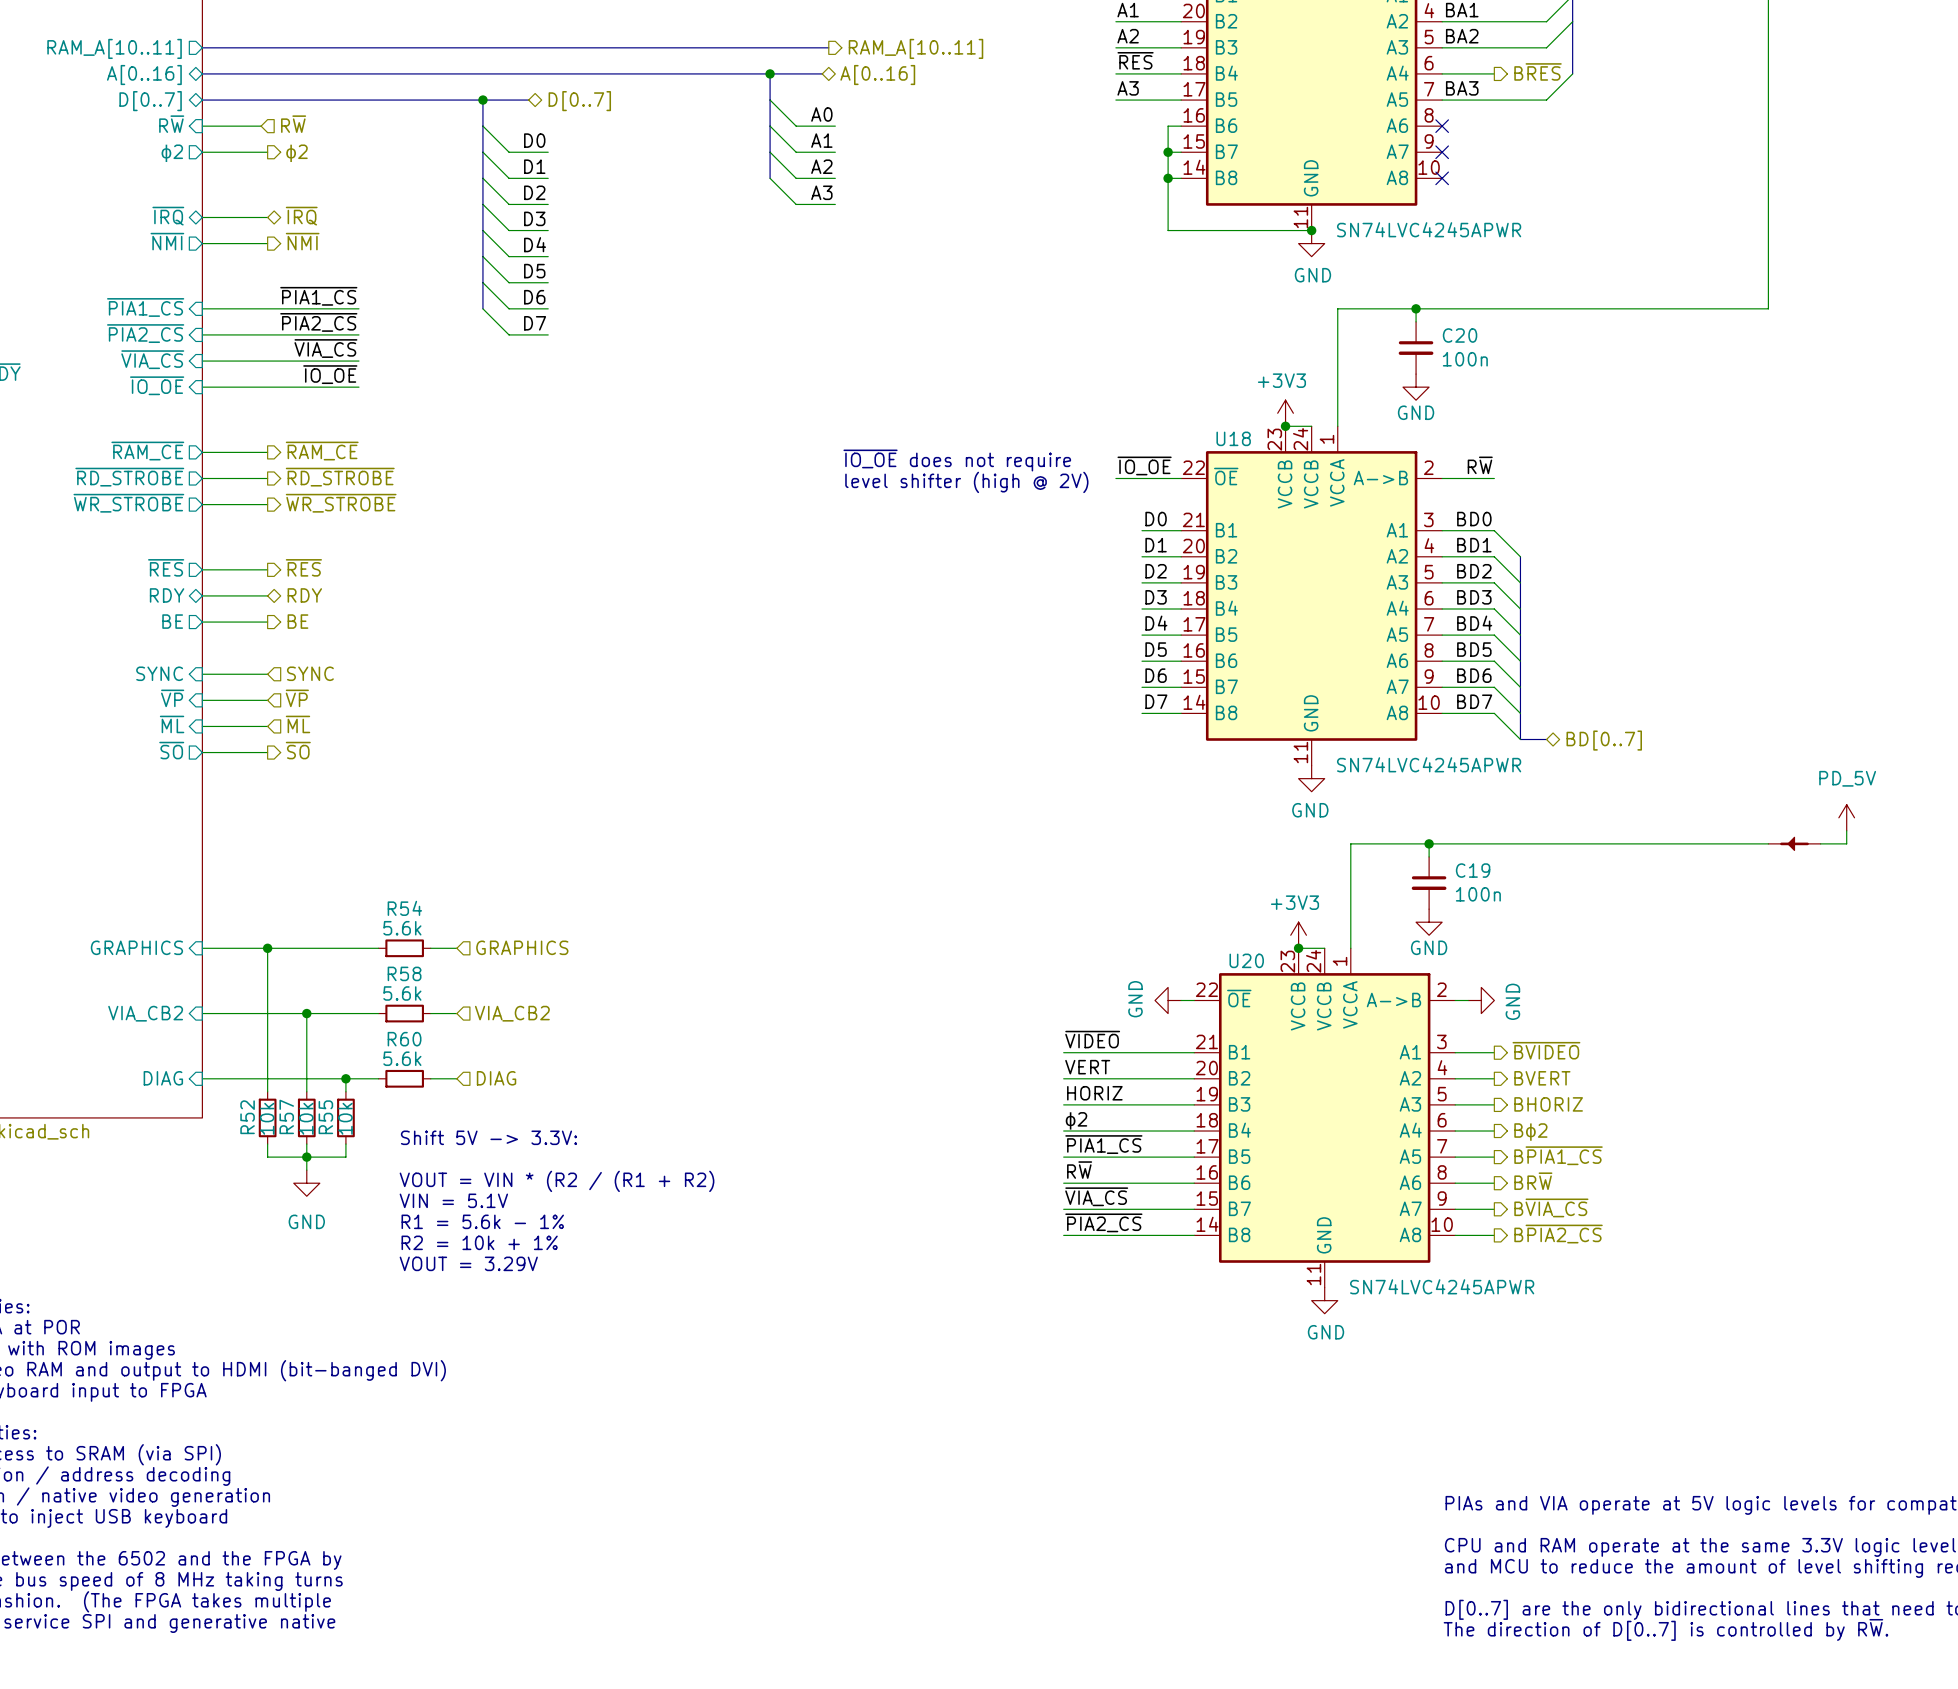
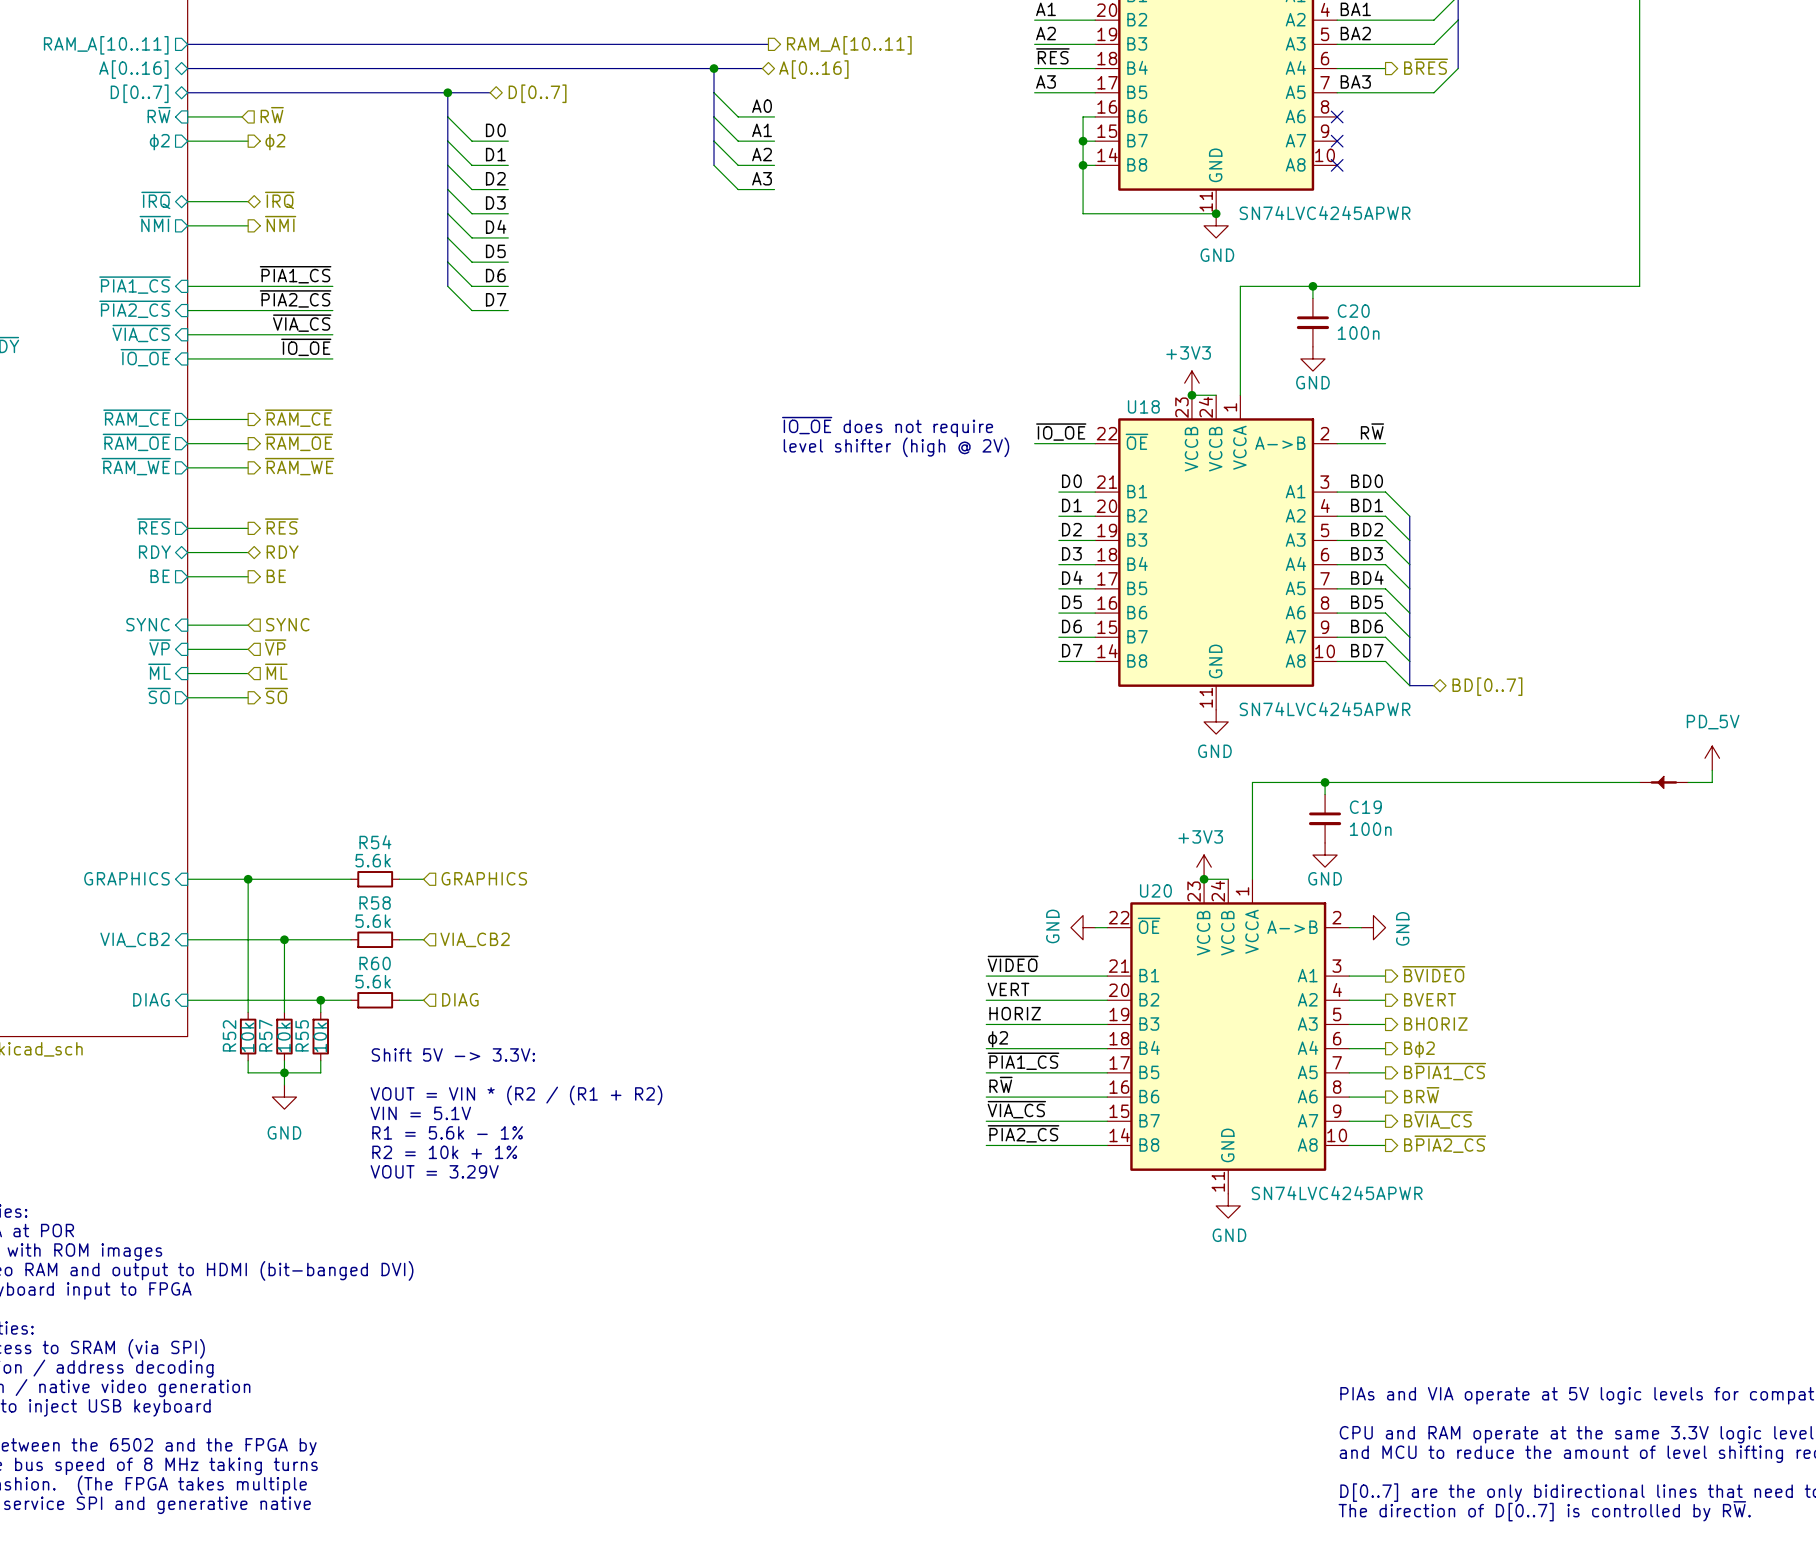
sheet pin: ~{RD_STROBE} (129, 477) -> ~{RAM_OE} (136, 442)
hierarchical label: ~{RD_STROBE} (340, 477) -> ~{RAM_OE} (299, 442)
sheet pin: ~{WR_STROBE} (128, 503) -> ~{RAM_WE} (136, 466)
hierarchical label: ~{WR_STROBE} (341, 503) -> ~{RAM_WE} (299, 466)

